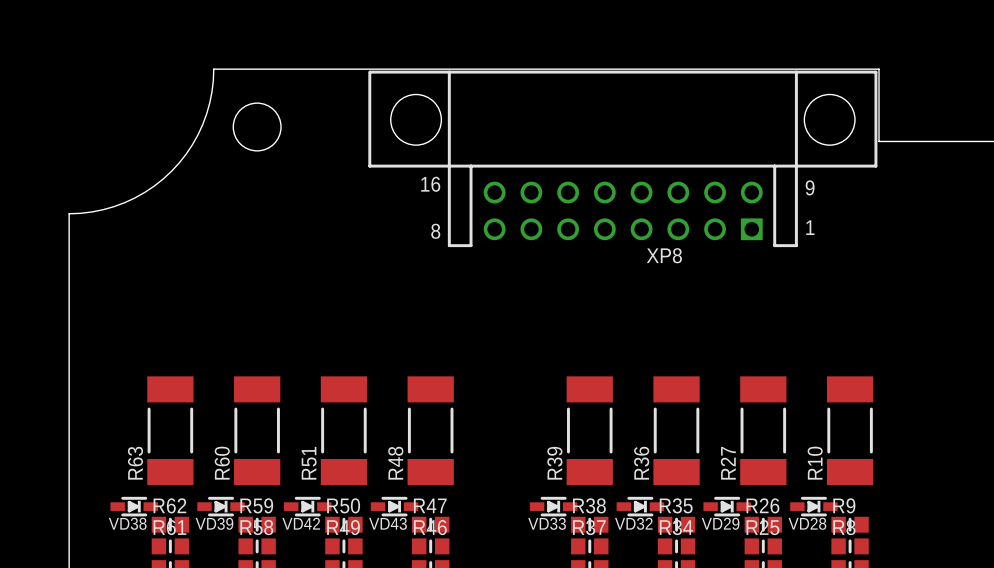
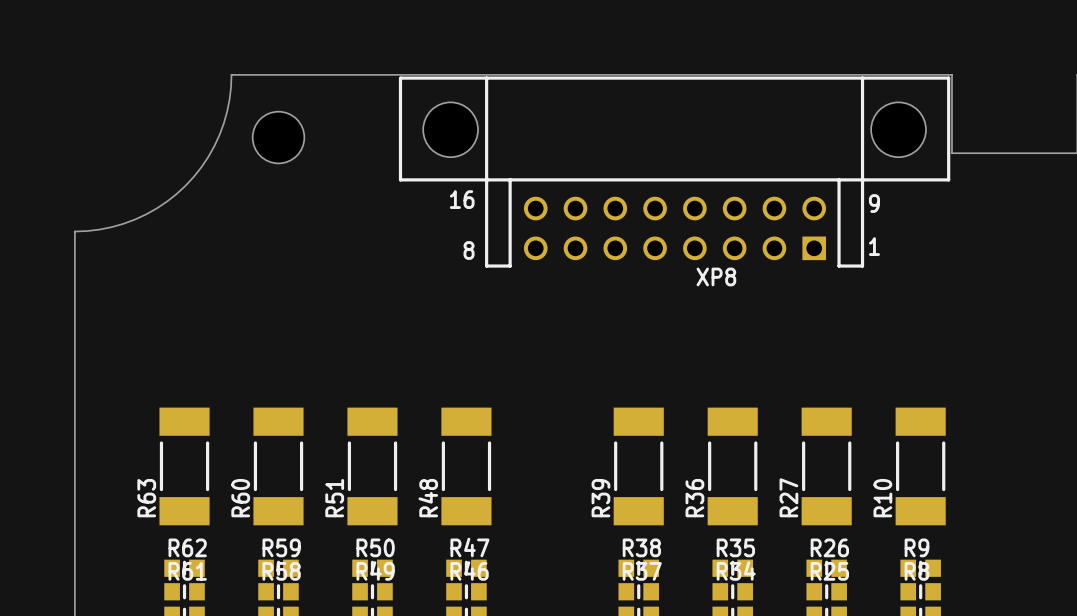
VD38: (134, 506) -> none
VD39: (221, 506) -> none
VD42: (307, 506) -> none
VD43: (394, 506) -> none
VD33: (553, 506) -> none
VD32: (640, 506) -> none
VD29: (727, 506) -> none
VD28: (813, 506) -> none

